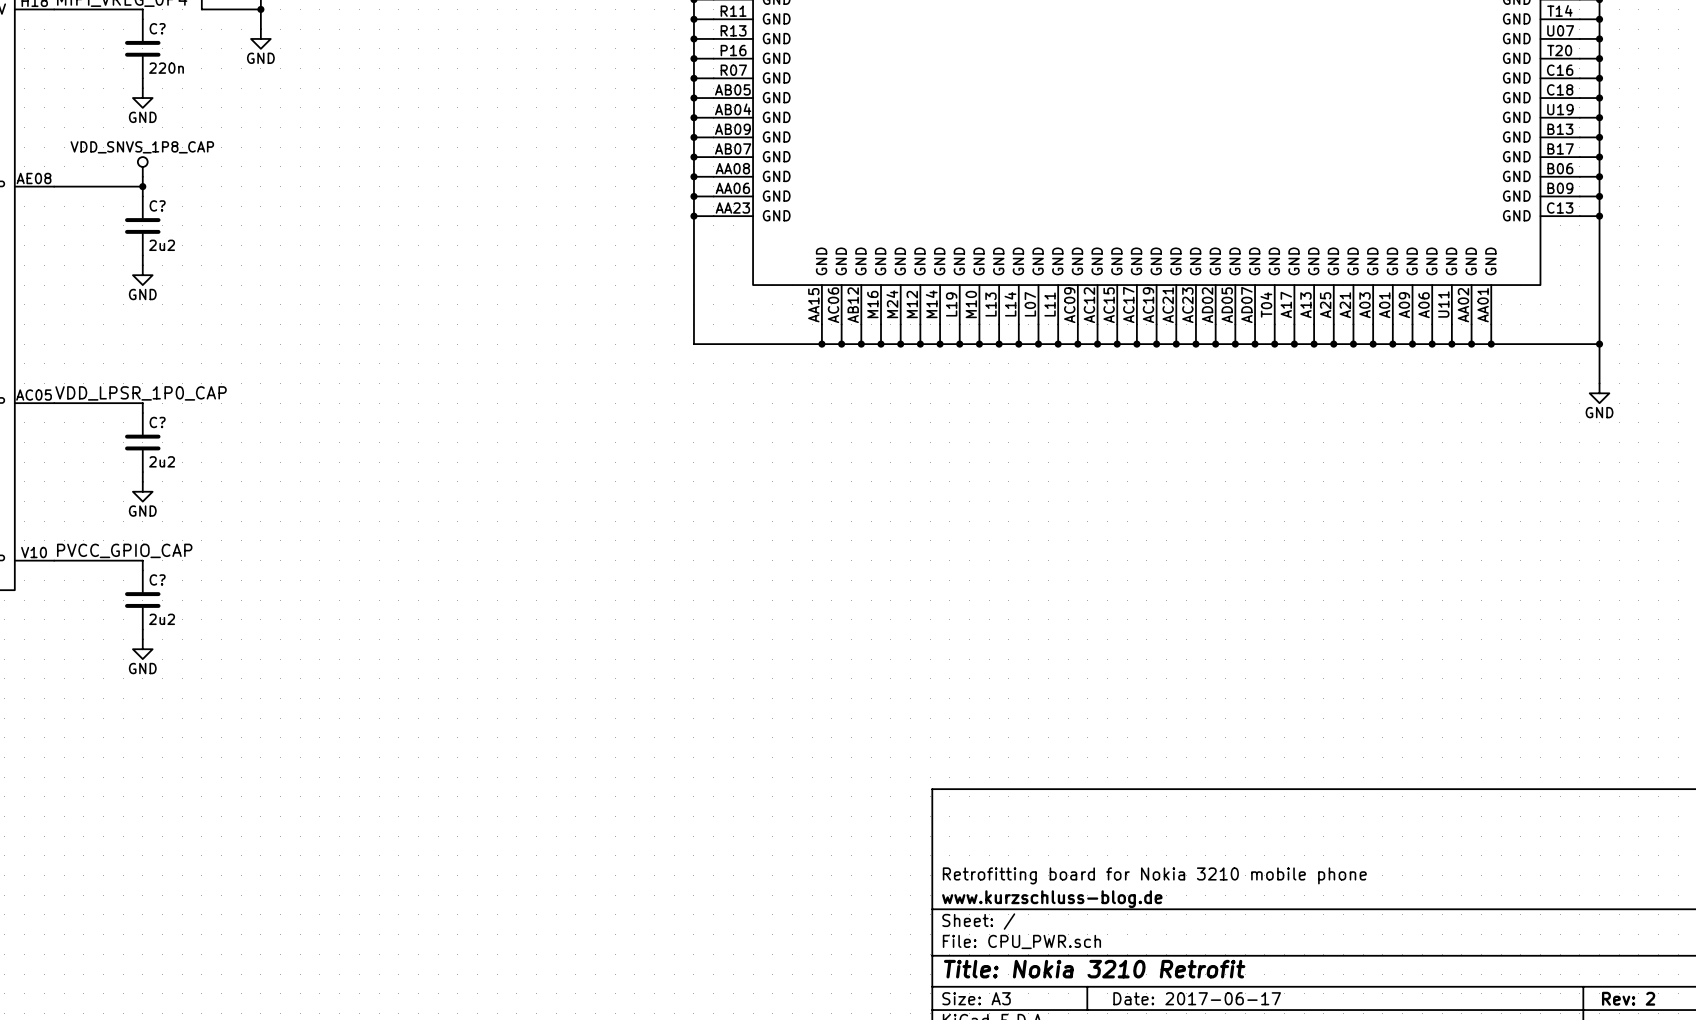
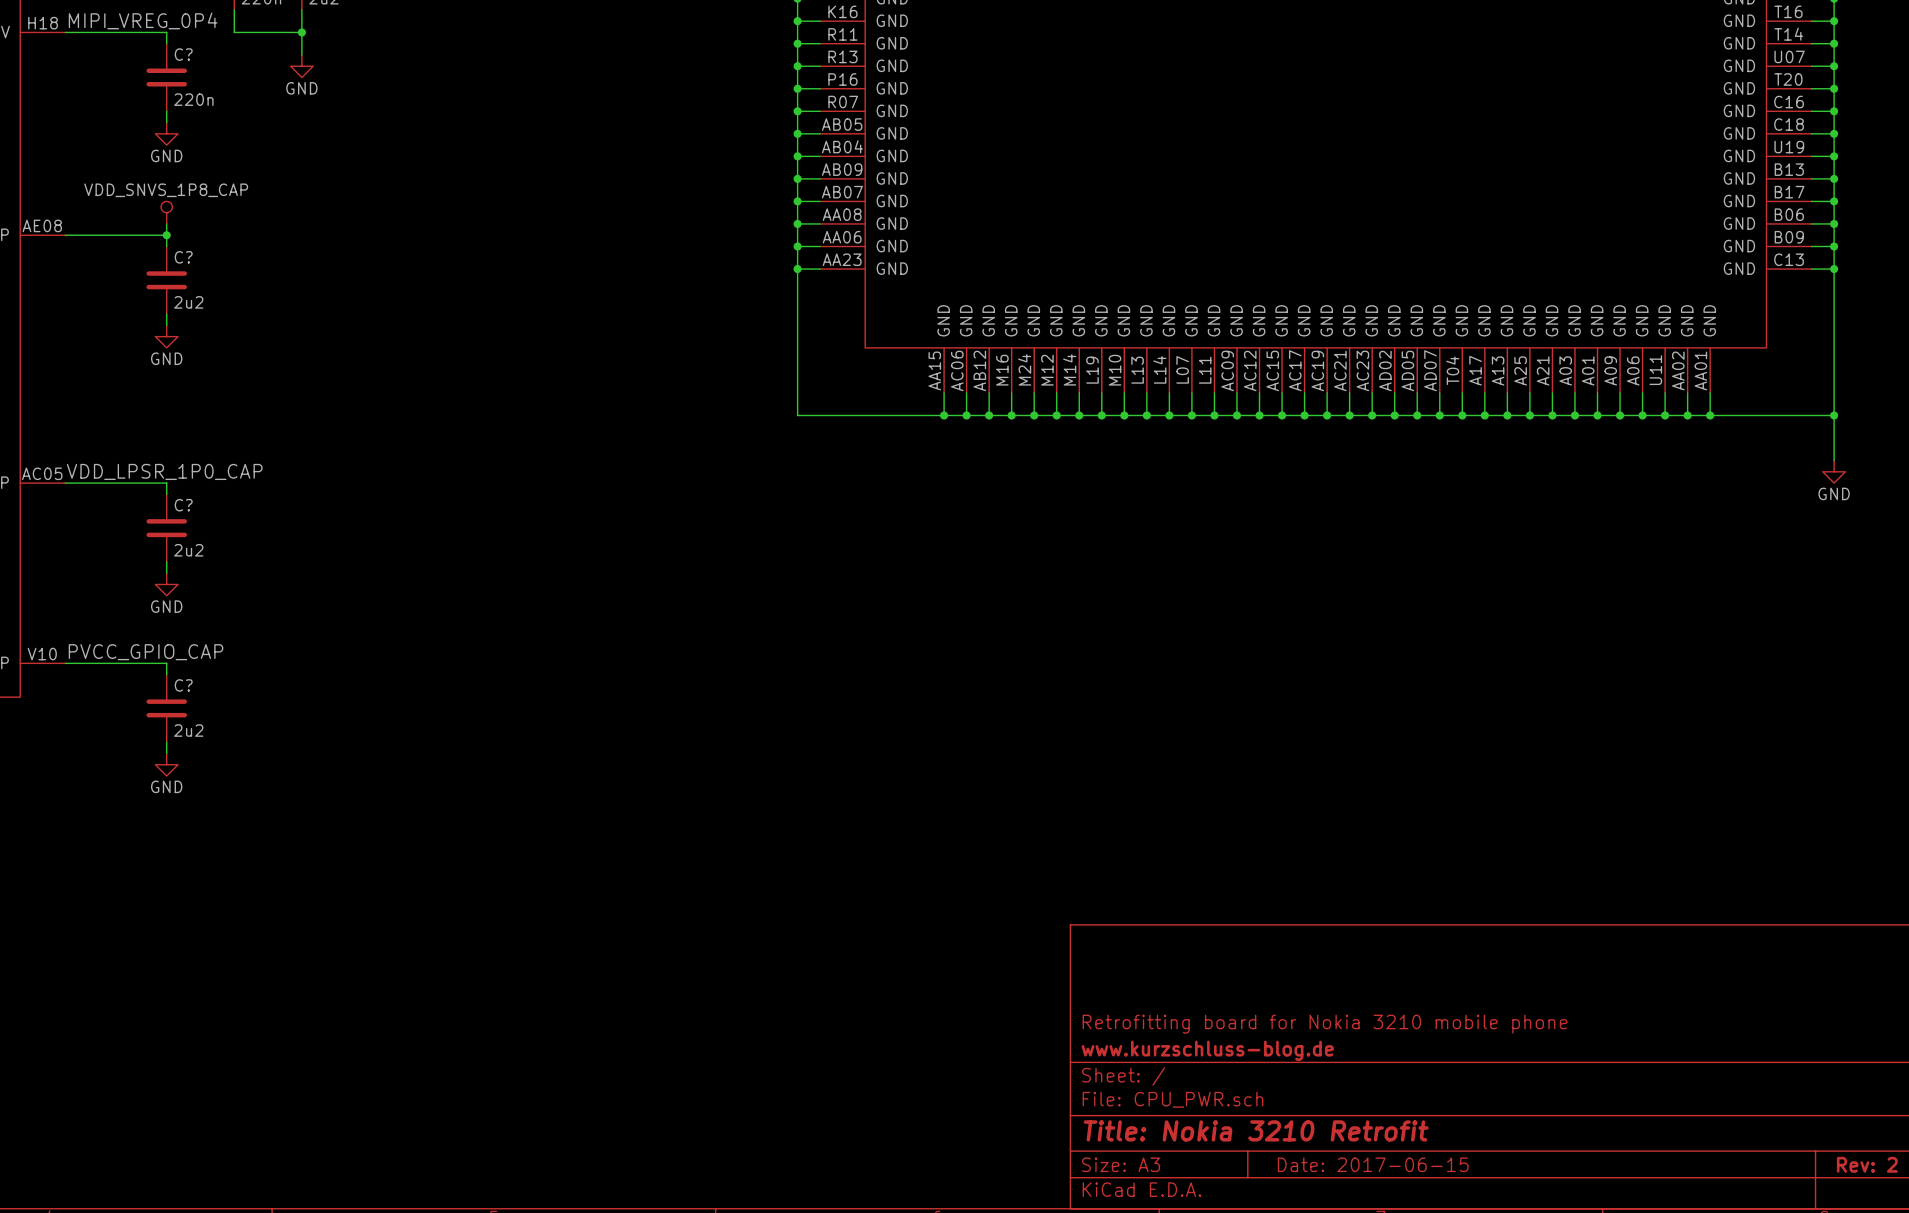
title block: Date: 2017-06-17 (1197, 998) -> Date: 2017-06-15 (1373, 1164)

